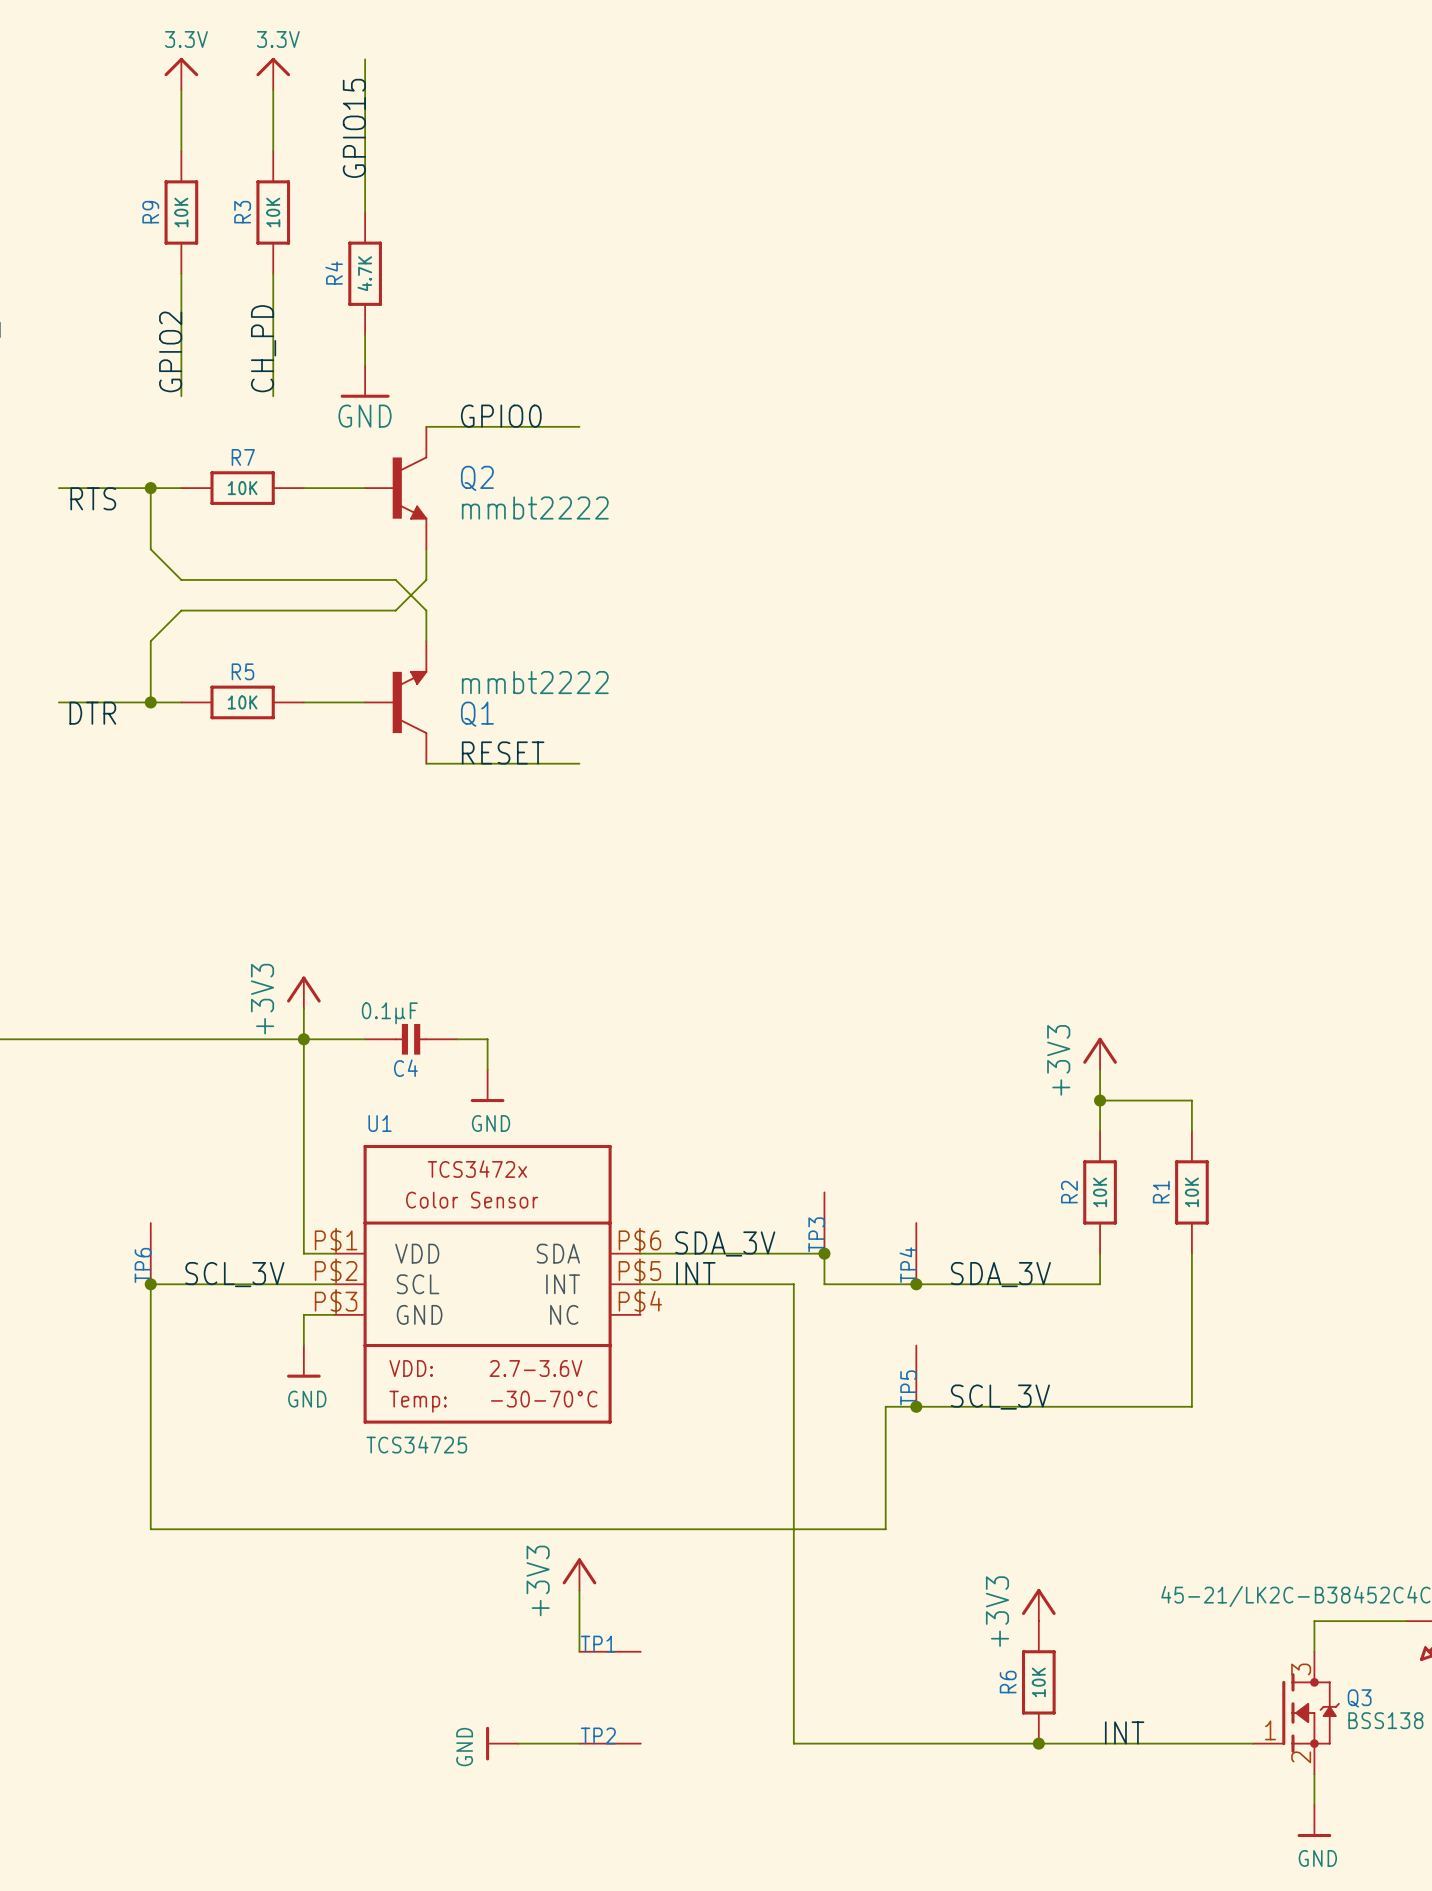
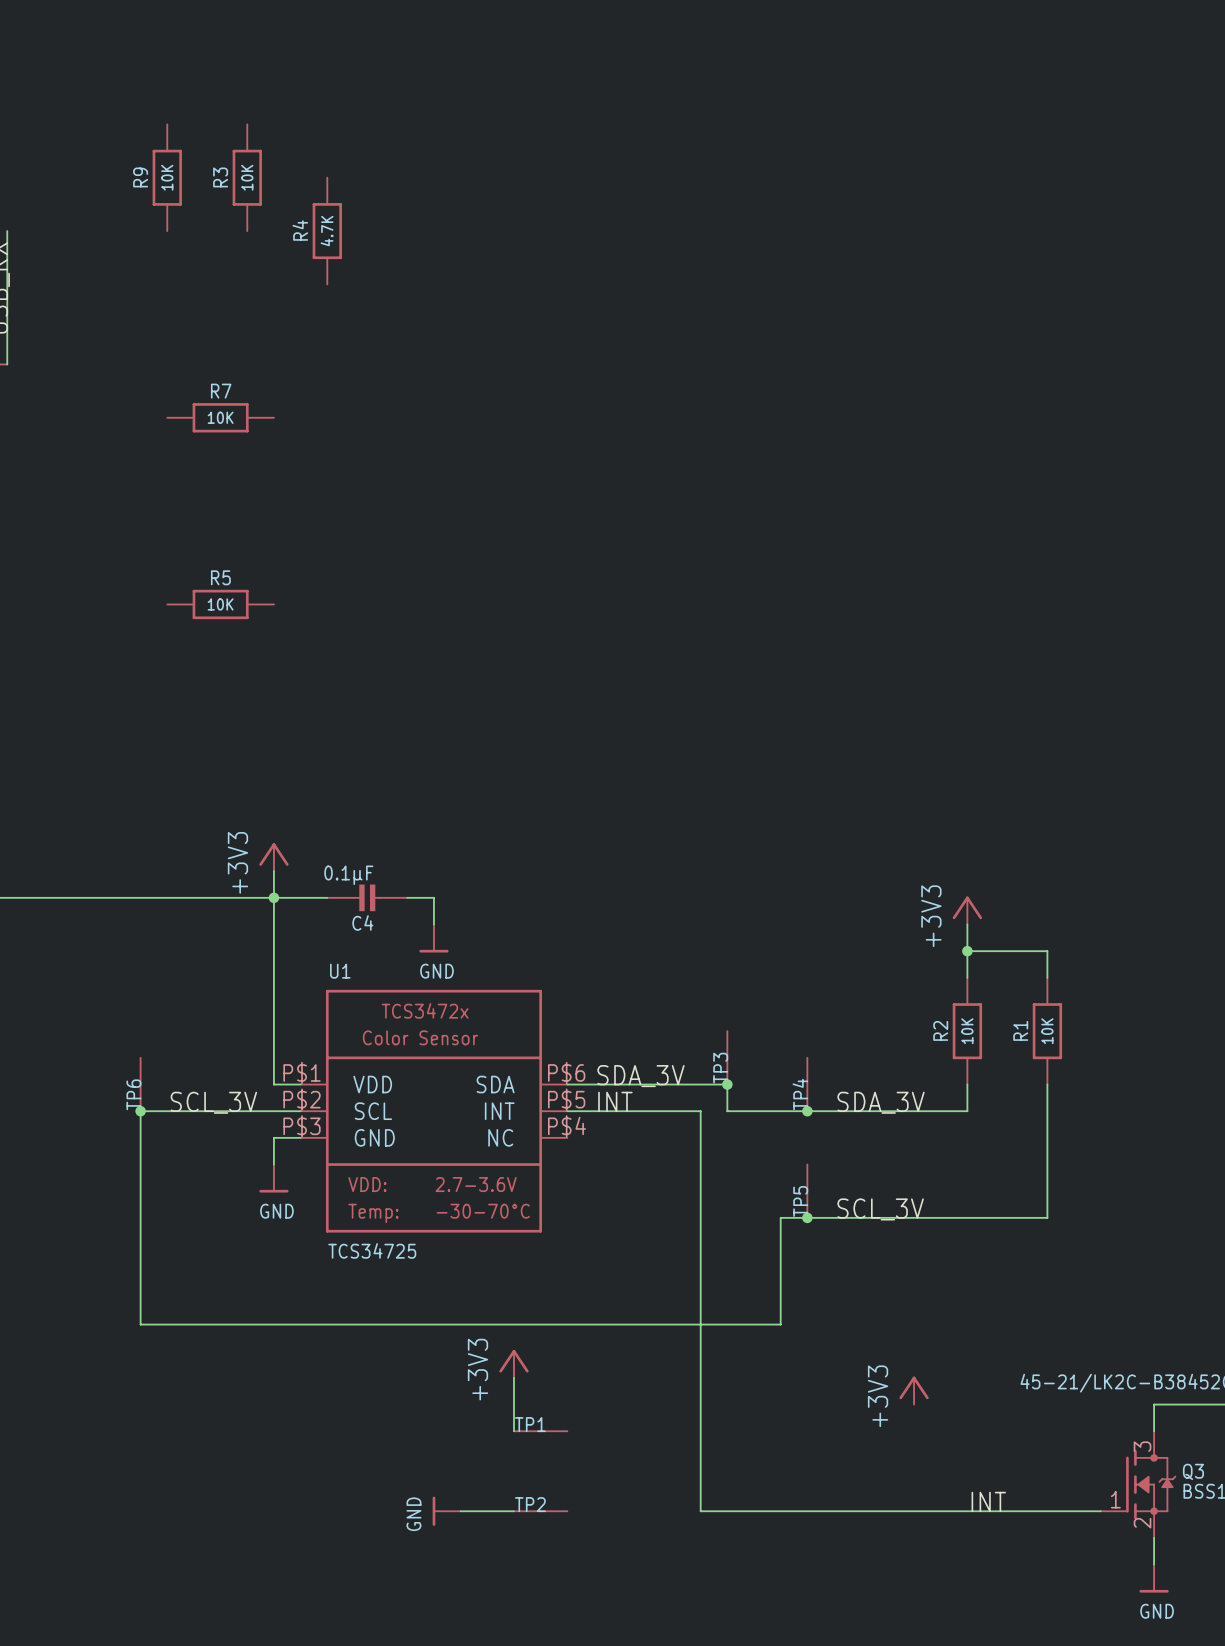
wire: (365, 59) (365, 212) -> none
power symbol: 3.3V (181, 73) -> none
power symbol: 3.3V (273, 73) -> none
wire: (181, 89) (181, 151) -> none
wire: (273, 89) (273, 151) -> none
label: GPIO15 (354, 128) -> none
wire: (181, 273) (181, 396) -> none
wire: (273, 273) (273, 396) -> none
wire: (365, 334) (365, 365) -> none
label: CH_PD (263, 348) -> none
label: GPIO2 (170, 351) -> none
power symbol: GND (365, 381) -> none
label: GPIO0 (501, 416) -> none
wire: (426, 426) (579, 426) -> none
wire: (58, 488) (181, 488) -> none
wire: (150, 488) (150, 549) (181, 579) (395, 579) (426, 610) (426, 641) -> none
junction: (150, 488) -> none
wire: (303, 488) (365, 488) -> none
Q2: mmbt2222 (396, 488) -> none
label: RTS (93, 498) -> none
wire: (426, 549) (426, 579) (395, 610) (181, 610) (150, 641) (150, 702) -> none
wire: (58, 702) (181, 702) -> none
junction: (150, 702) -> none
wire: (303, 702) (365, 702) -> none
Q1: mmbt2222 (396, 702) -> none
label: DTR (92, 713) -> none
label: RESET (503, 752) -> none
wire: (426, 763) (579, 763) -> none
R6: 10K (1038, 1682) -> none
junction: (1038, 1743) -> none

